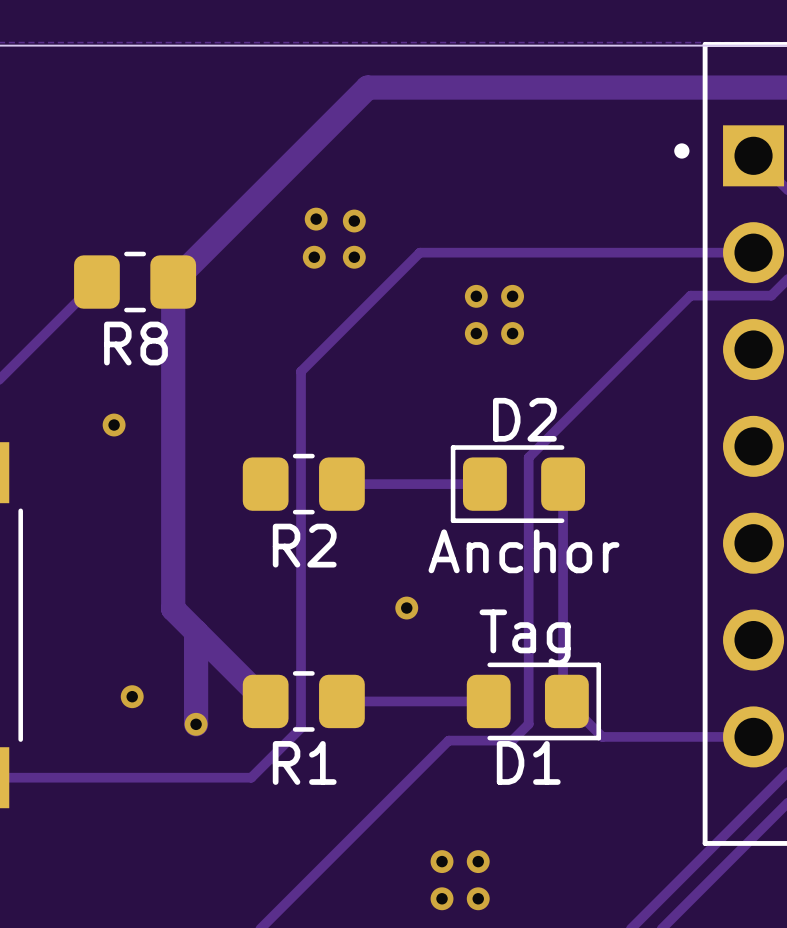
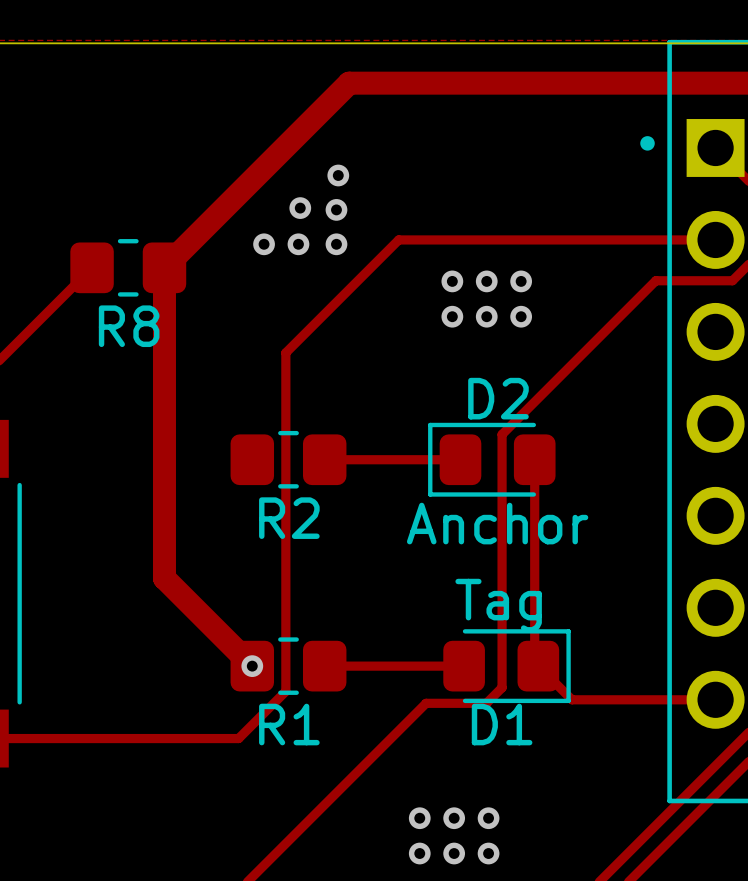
via: none -> (338, 175)
via: none -> (264, 244)
via: none -> (521, 281)
via: none -> (521, 316)
via: (114, 425) -> none
via: (406, 608) -> none
track: (196, 631) (196, 724) -> none
via: (132, 696) -> none
via: none -> (252, 666)
via: (196, 724) -> none
via: none -> (488, 818)
via: none -> (488, 853)

